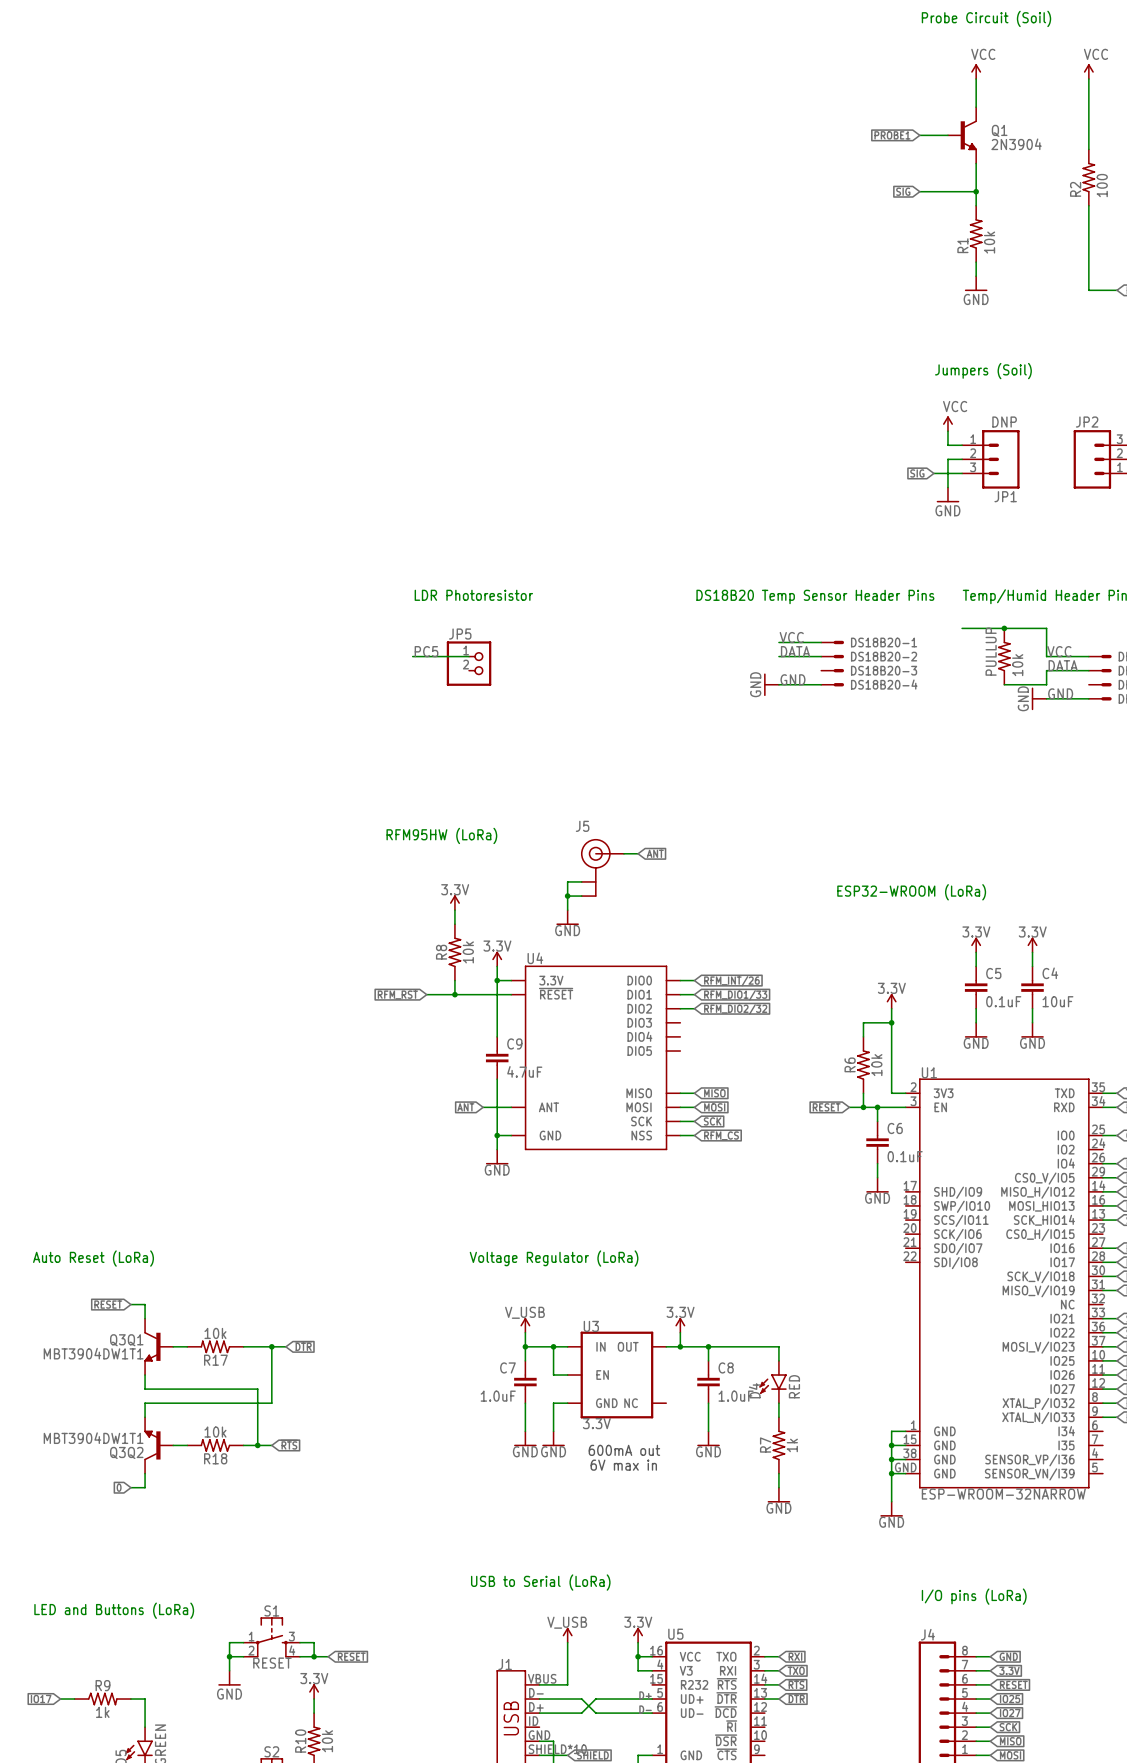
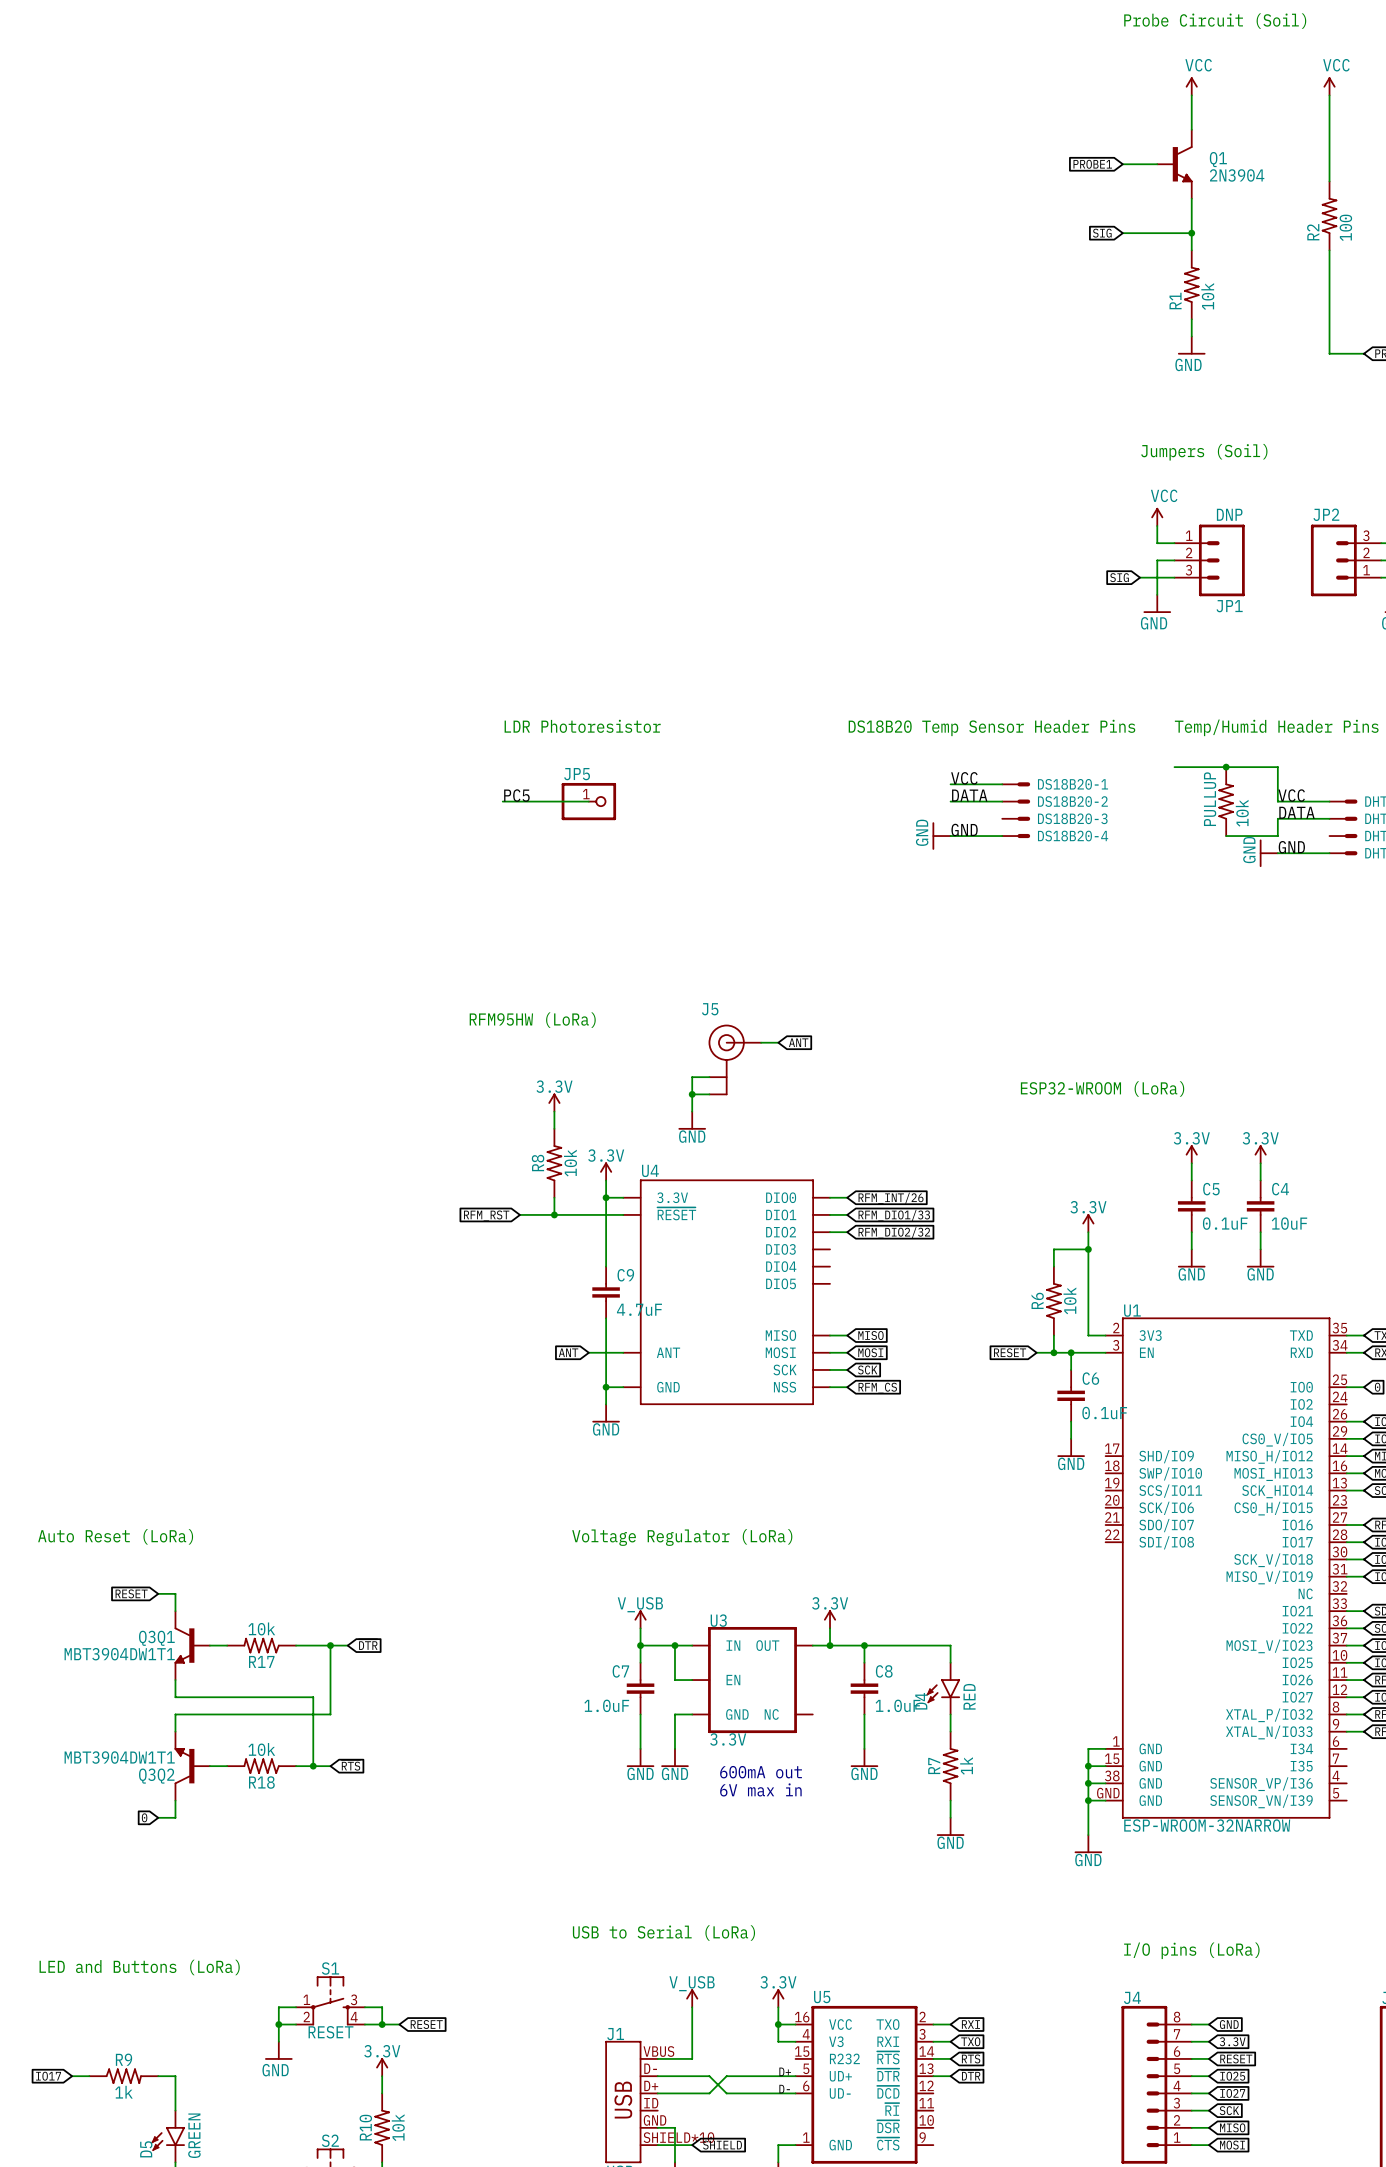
JP5 symbol: [446, 641, 492, 686] -> [561, 782, 617, 821]

